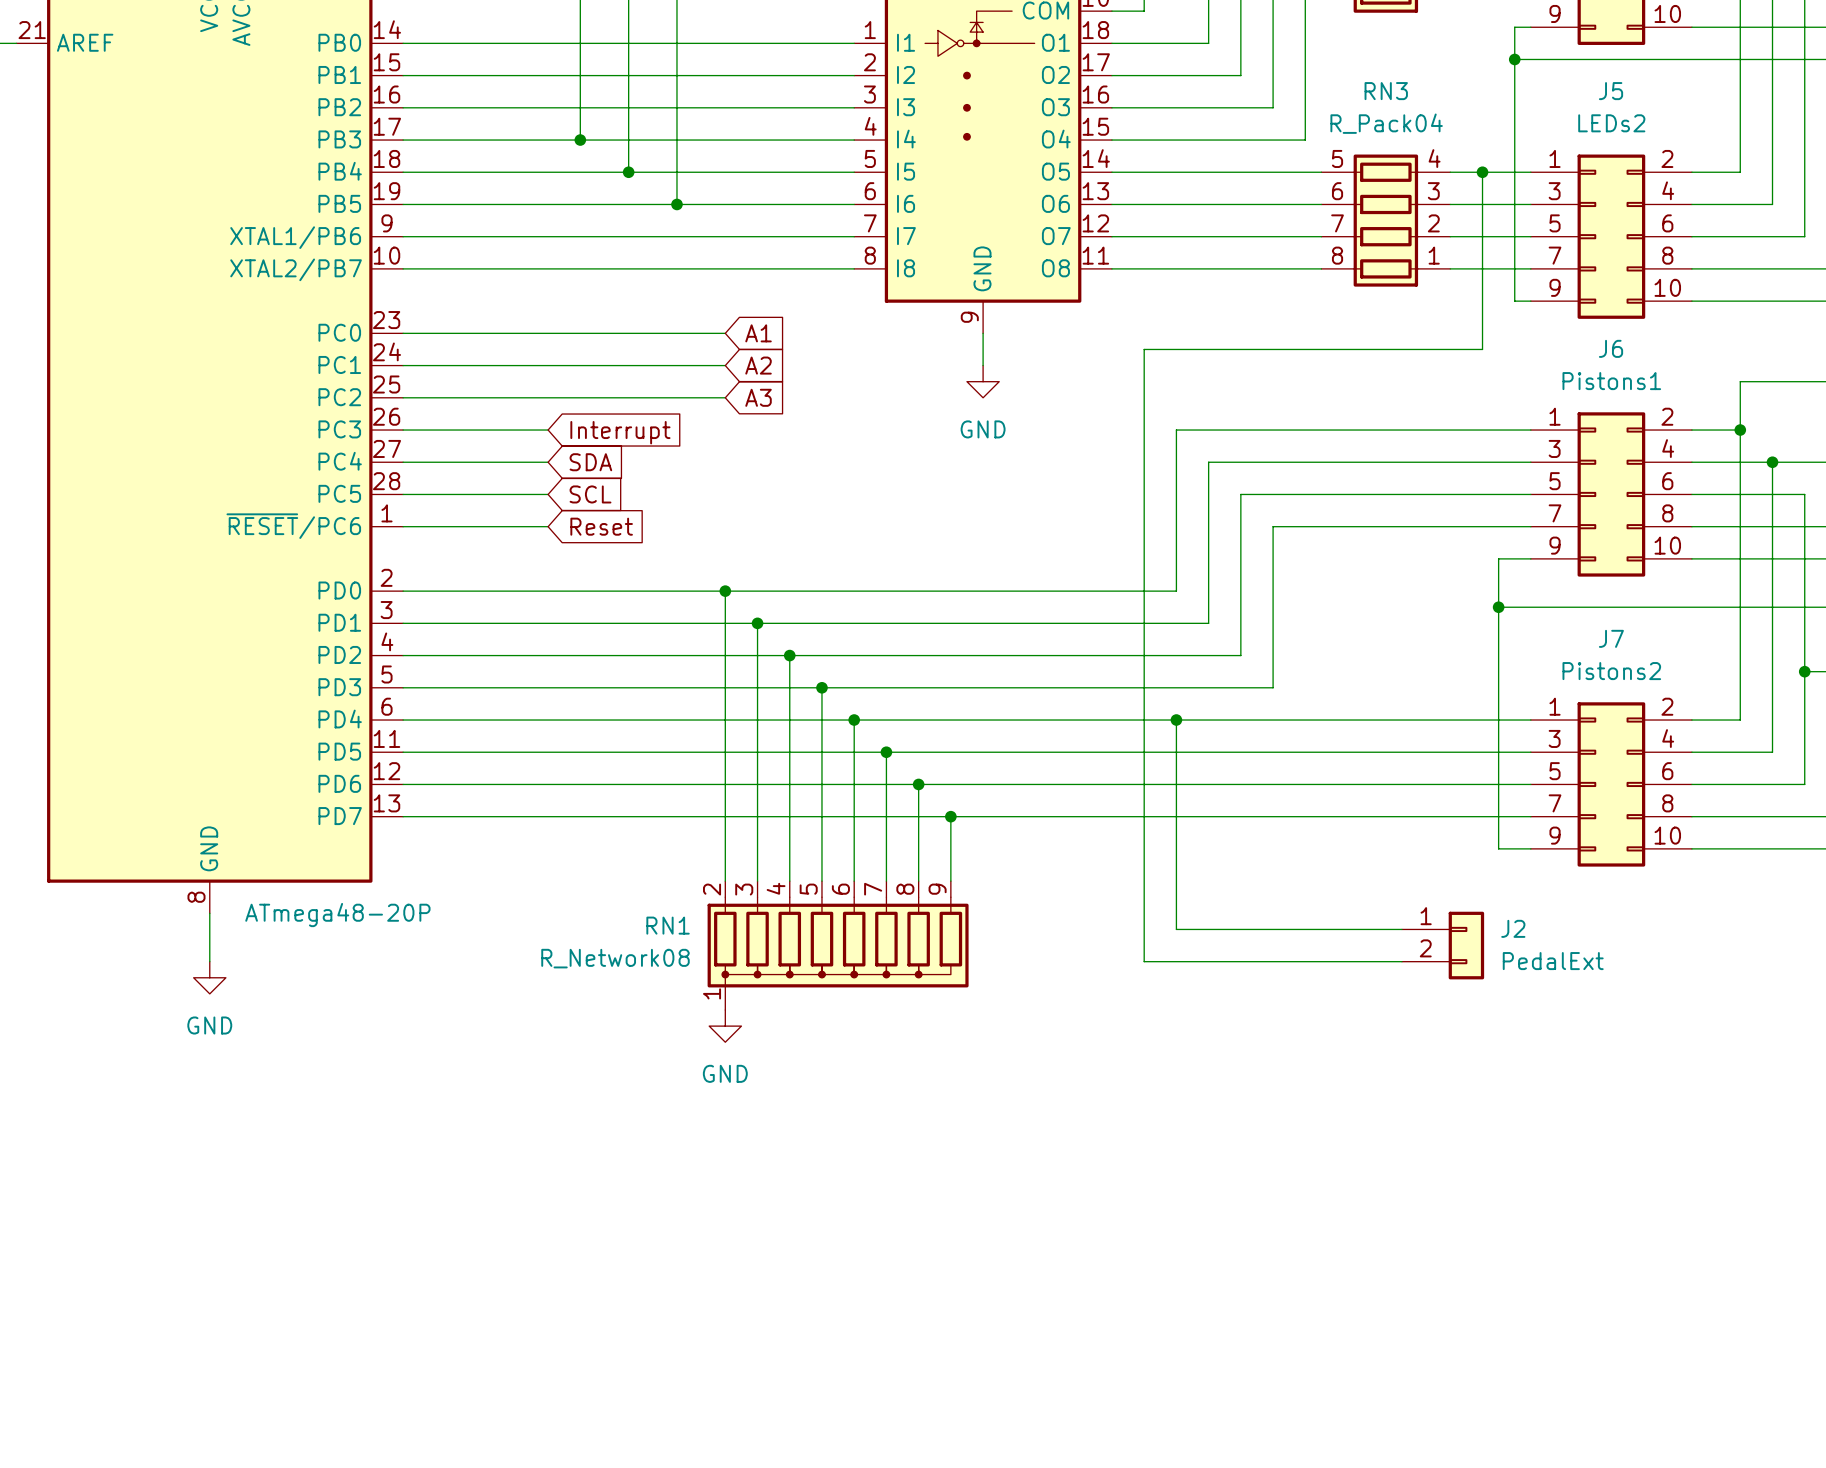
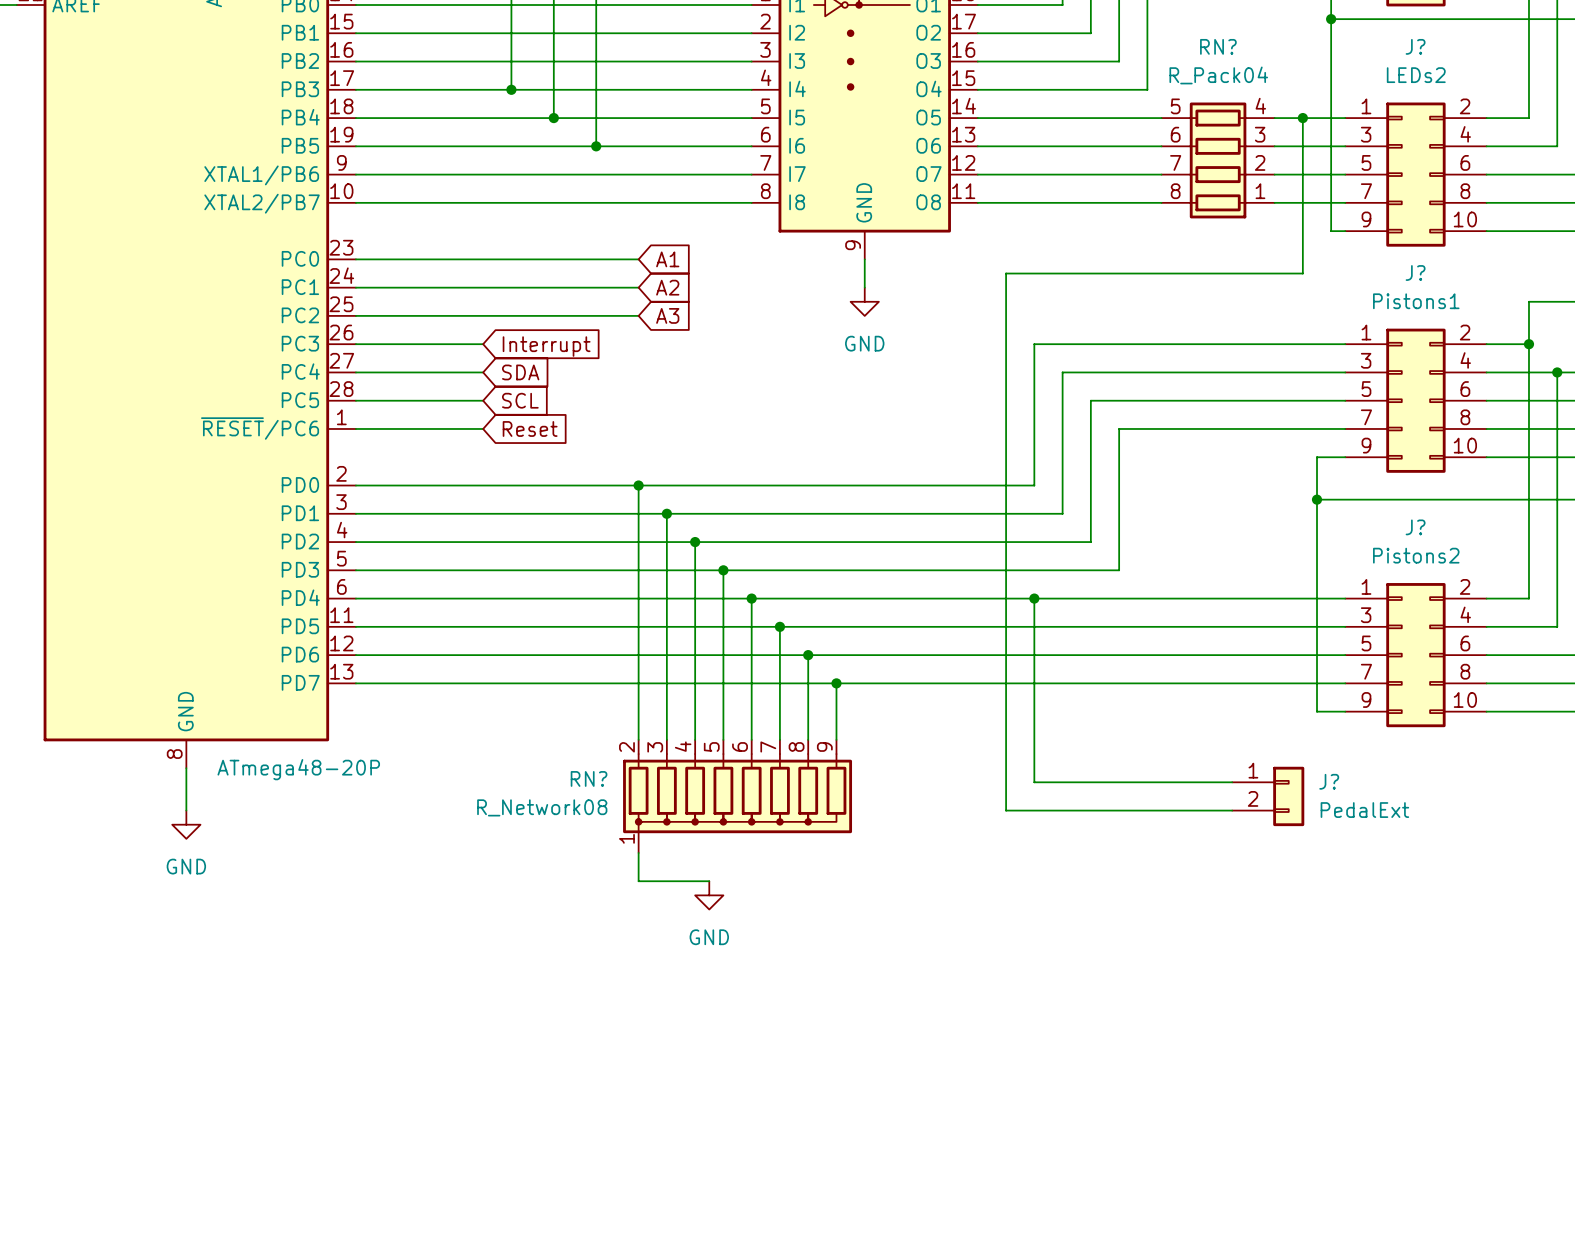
RN3 name: RN3 (1386, 91) -> RN? (1218, 46)
J5 name: J5 (1611, 91) -> J? (1415, 46)
J6 name: J6 (1611, 348) -> J? (1415, 273)
J7 name: J7 (1611, 638) -> J? (1415, 527)
RN1 name: RN1 (668, 925) -> RN? (589, 778)
J2 name: J2 (1513, 928) -> J? (1329, 781)
wire: none -> (638, 852) (638, 881) (709, 881)
power symbol position: GND (725, 1026) -> GND (709, 895)

